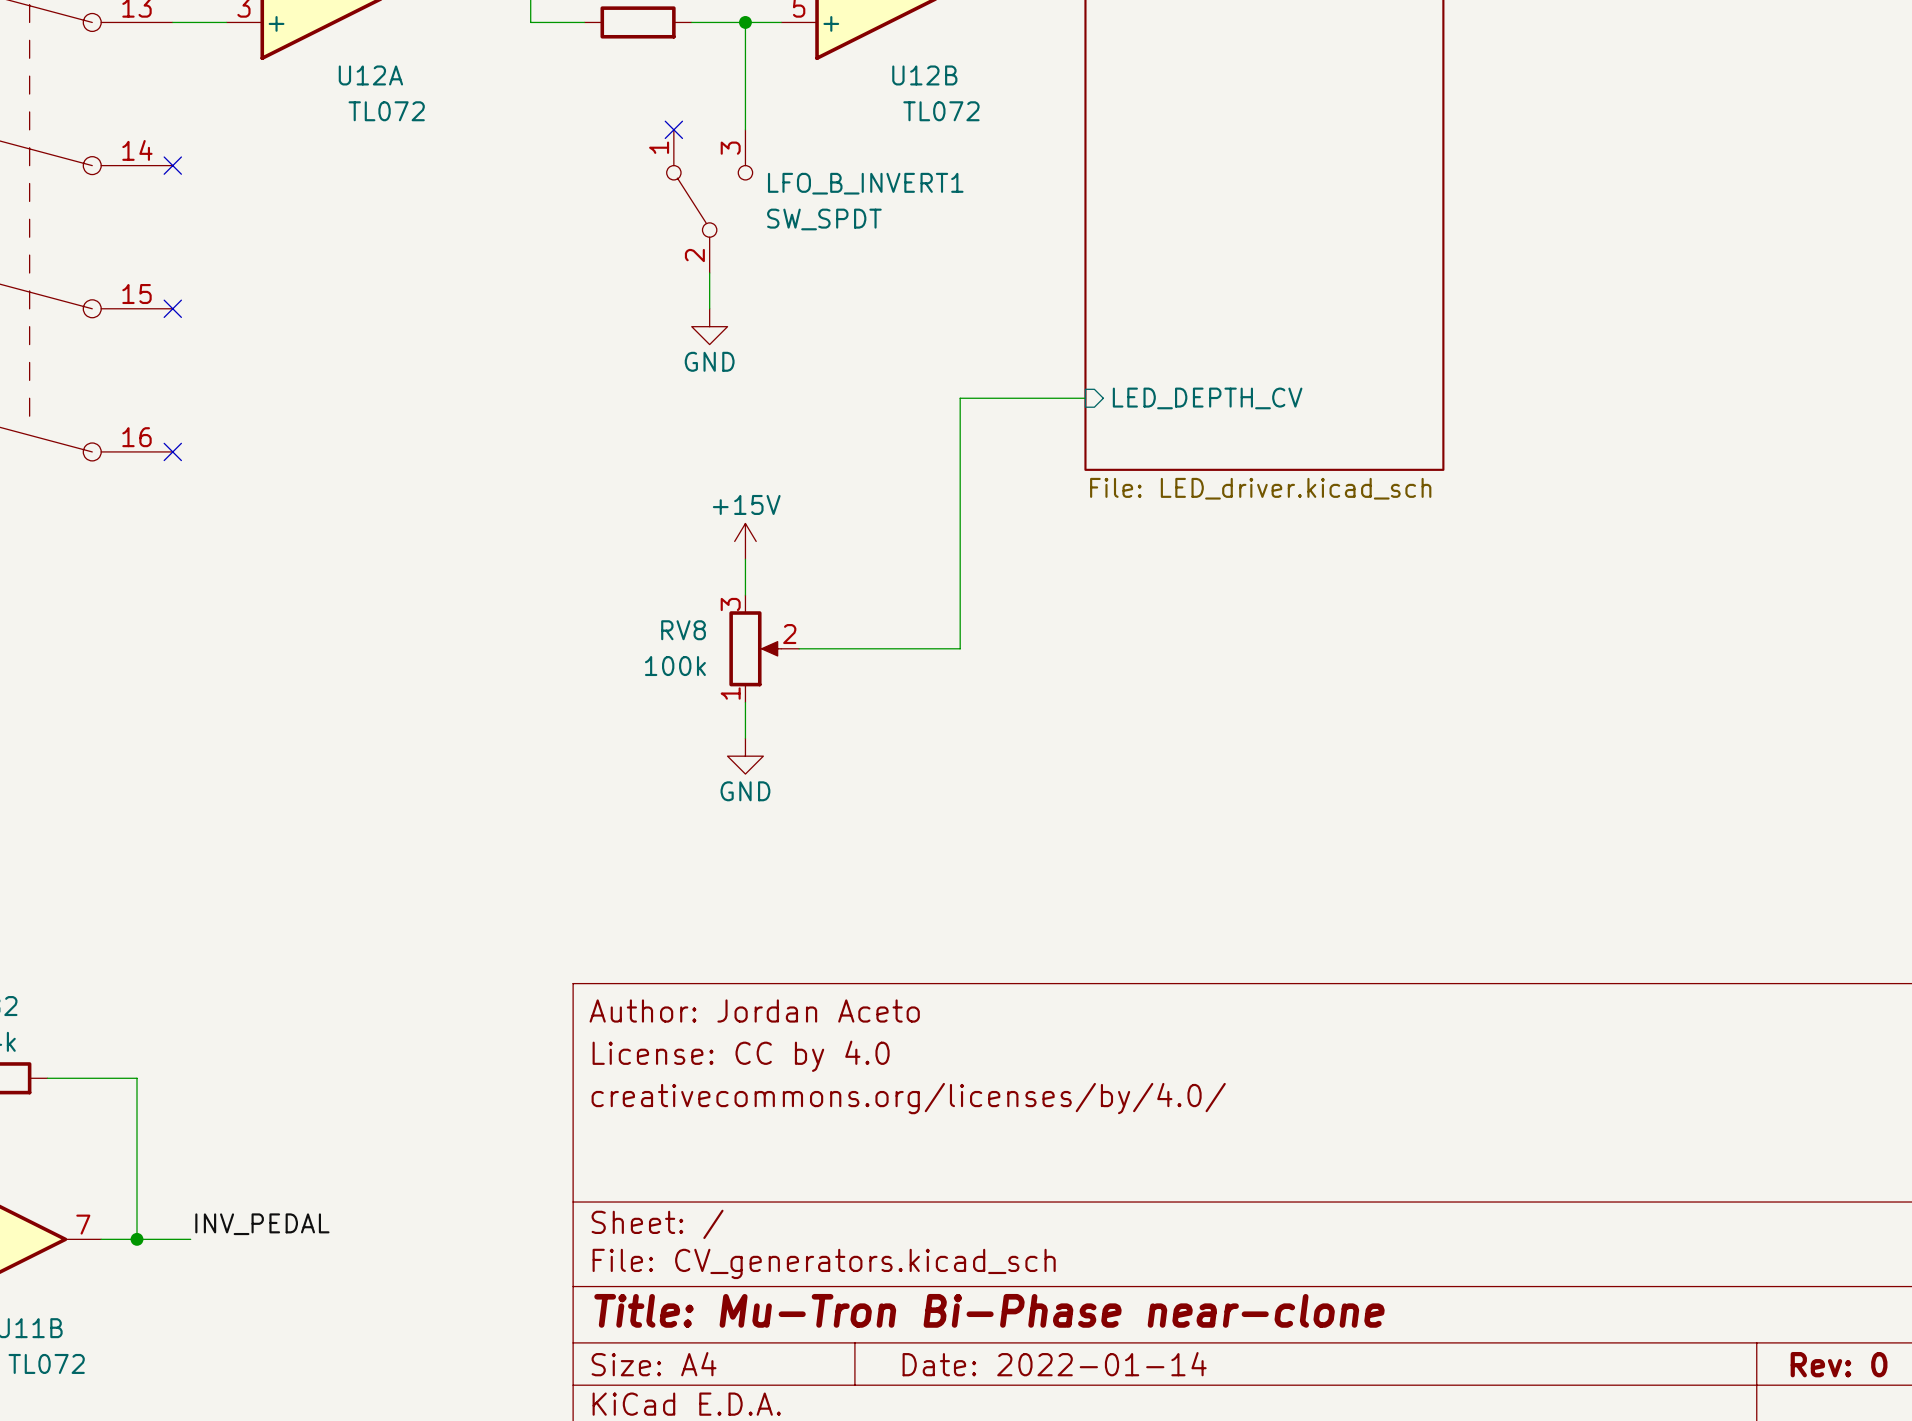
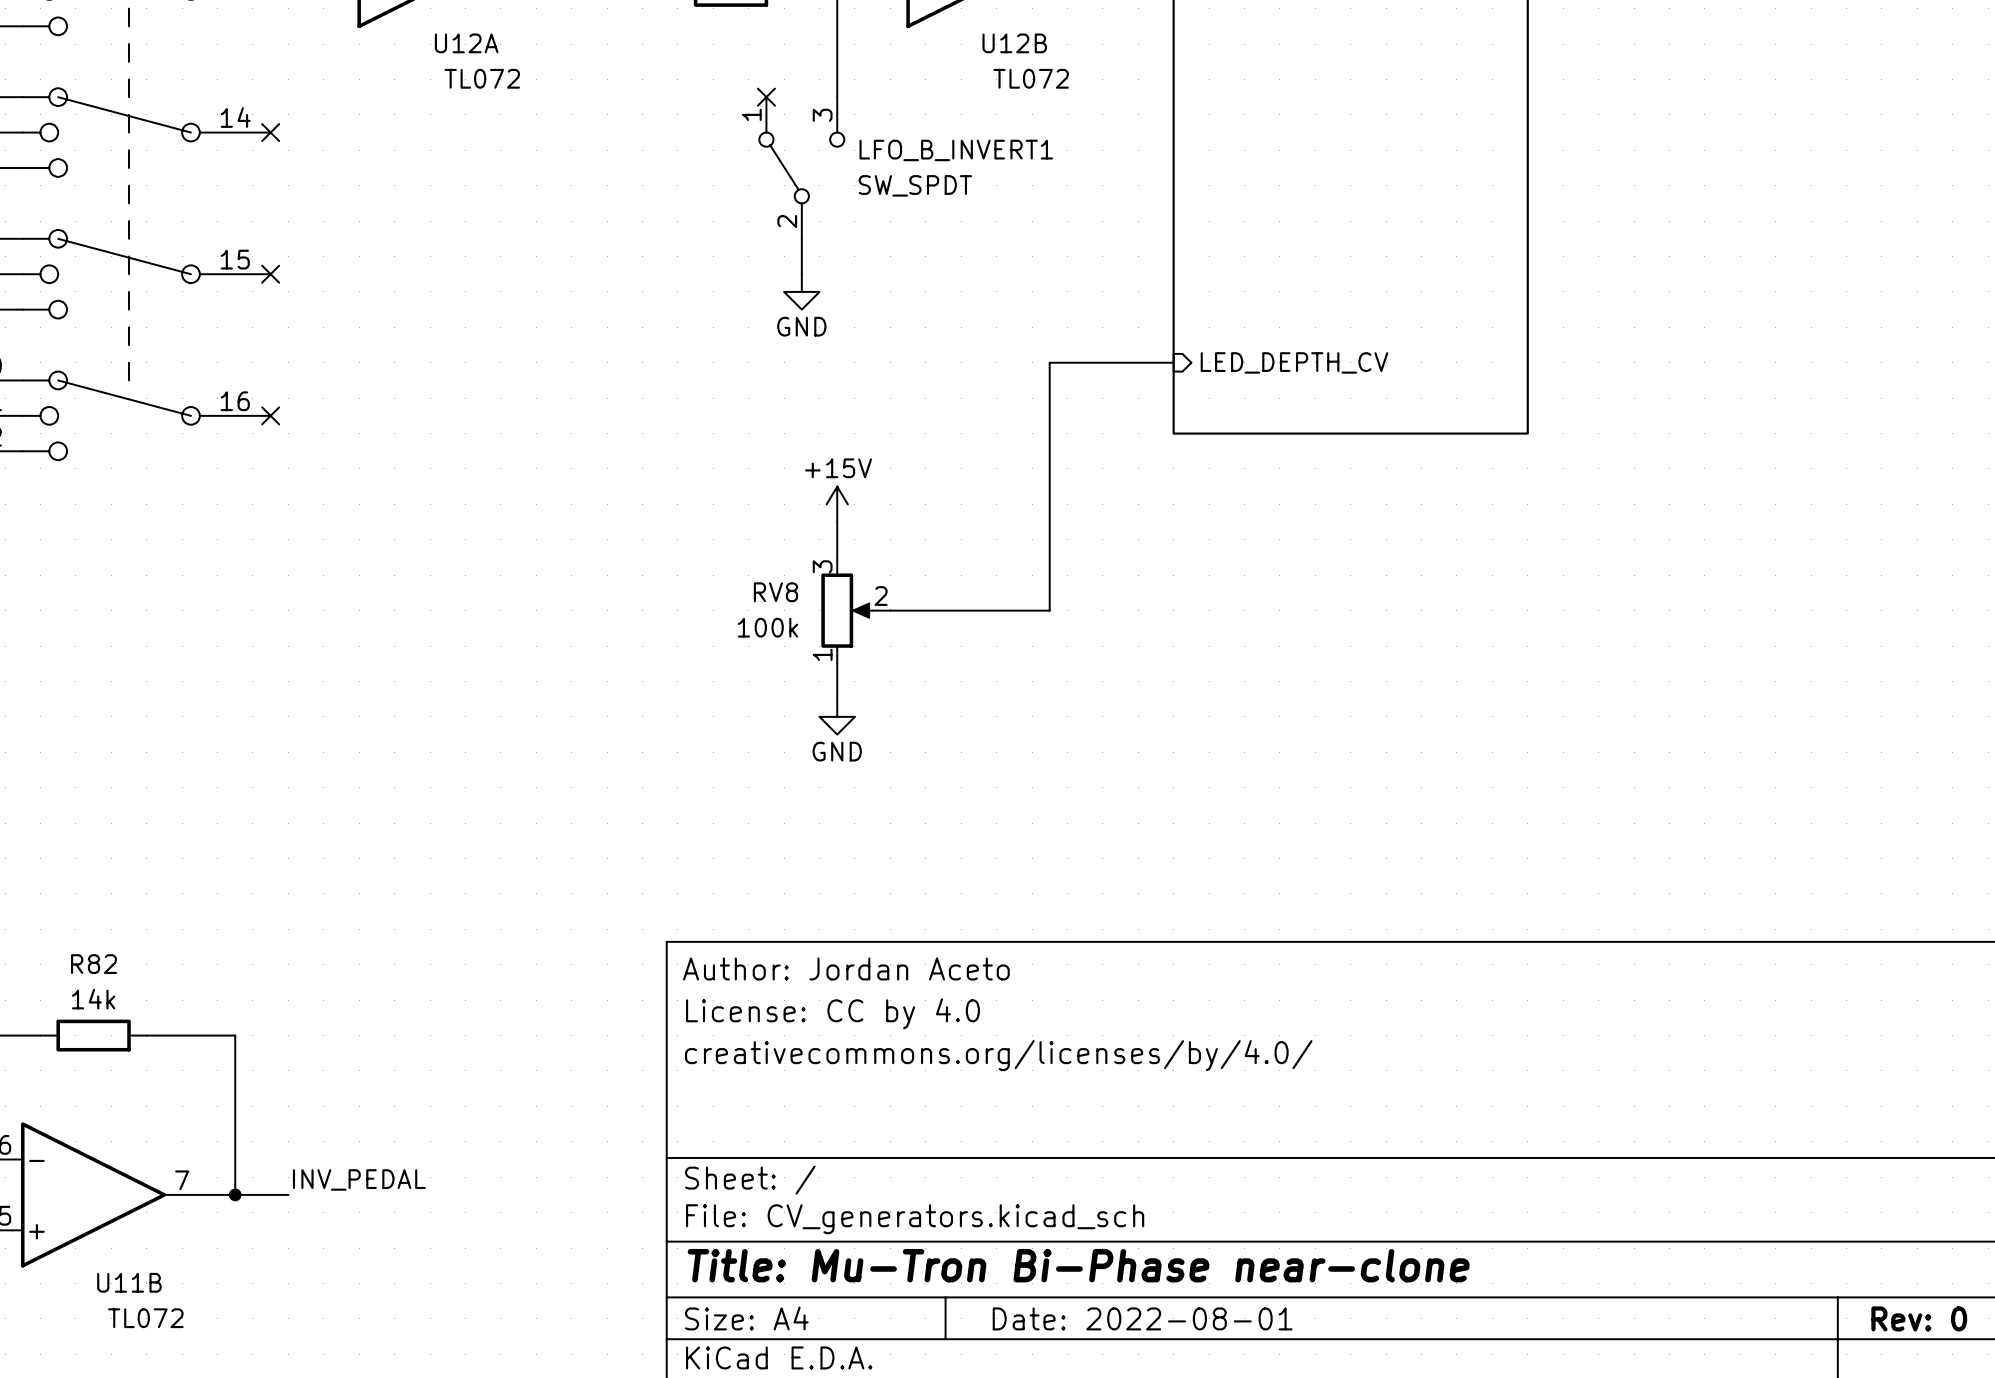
sheet value: File: LED_driver.kicad_sch (1260, 488) -> none
title block: Date: 2022-01-14 (1054, 1364) -> Date: 2022-08-01 (1142, 1318)

